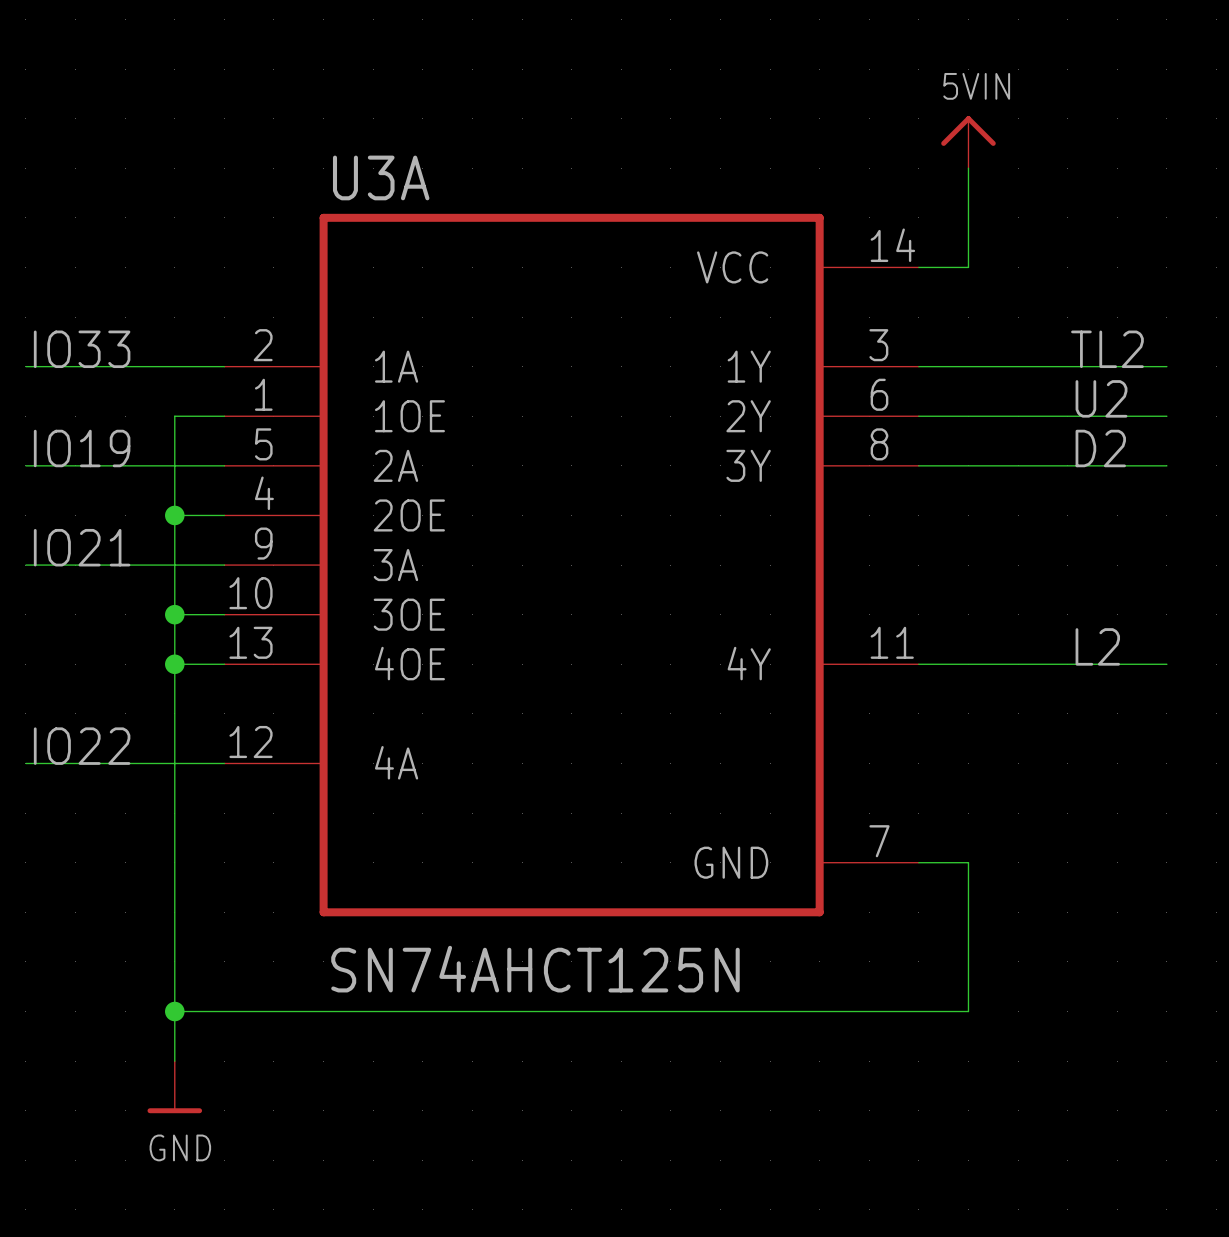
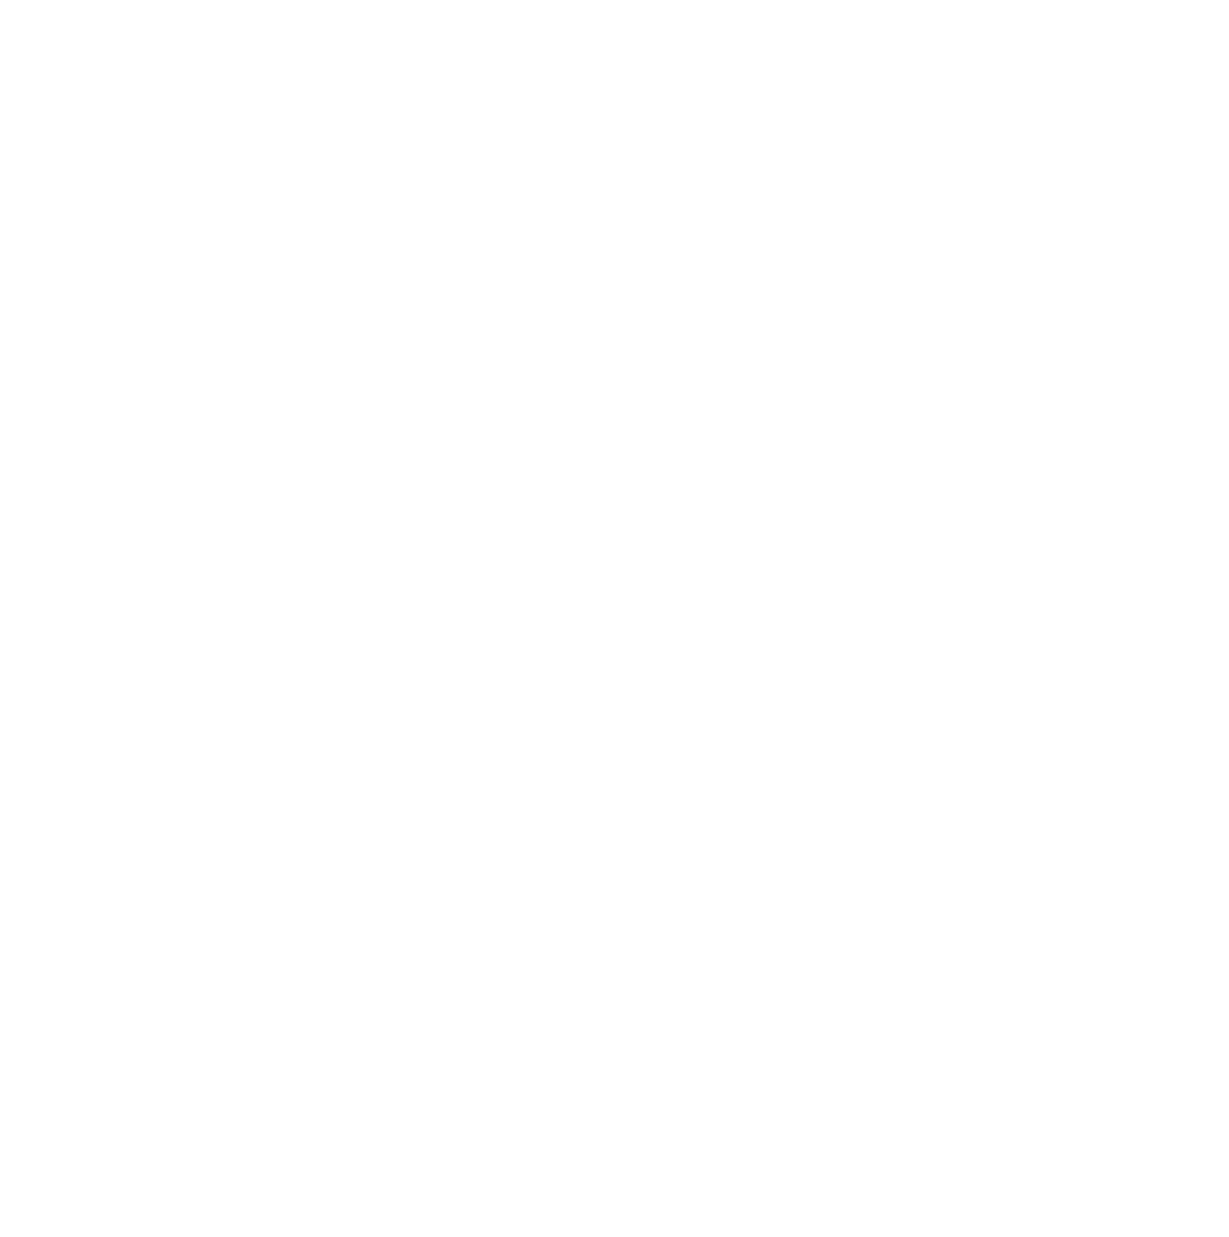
power symbol: 5VIN (968, 142) -> none
wire: (968, 168) (968, 267) (918, 267) -> none
label: IO33 (82, 349) -> none
label: TL2 (1107, 349) -> none
wire: (25, 366) (224, 366) -> none
wire: (918, 366) (1166, 366) -> none
label: U2 (1101, 398) -> none
wire: (224, 416) (174, 416) (174, 1061) -> none
wire: (918, 416) (1166, 416) -> none
label: IO19 (82, 448) -> none
label: D2 (1100, 448) -> none
wire: (25, 465) (224, 465) -> none
wire: (918, 465) (1166, 465) -> none
wire: (174, 515) (224, 515) -> none
junction: (174, 515) -> none
label: IO21 (82, 547) -> none
wire: (25, 565) (224, 565) -> none
U3A: SN74AHCT125N (571, 565) -> none
wire: (174, 614) (224, 614) -> none
junction: (174, 614) -> none
label: L2 (1097, 646) -> none
wire: (174, 664) (224, 664) -> none
junction: (174, 664) -> none
wire: (918, 664) (1166, 664) -> none
label: IO22 (82, 746) -> none
wire: (25, 763) (224, 763) -> none
wire: (918, 862) (968, 862) (968, 1011) (174, 1011) -> none
junction: (174, 1011) -> none
power symbol: GND (174, 1087) -> none

